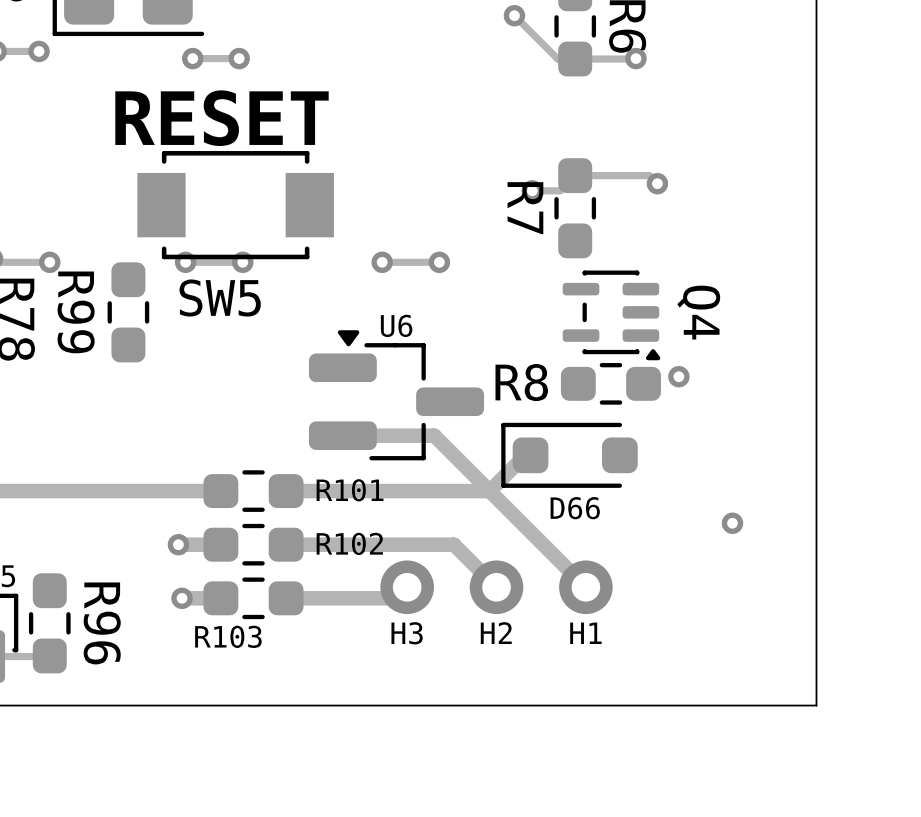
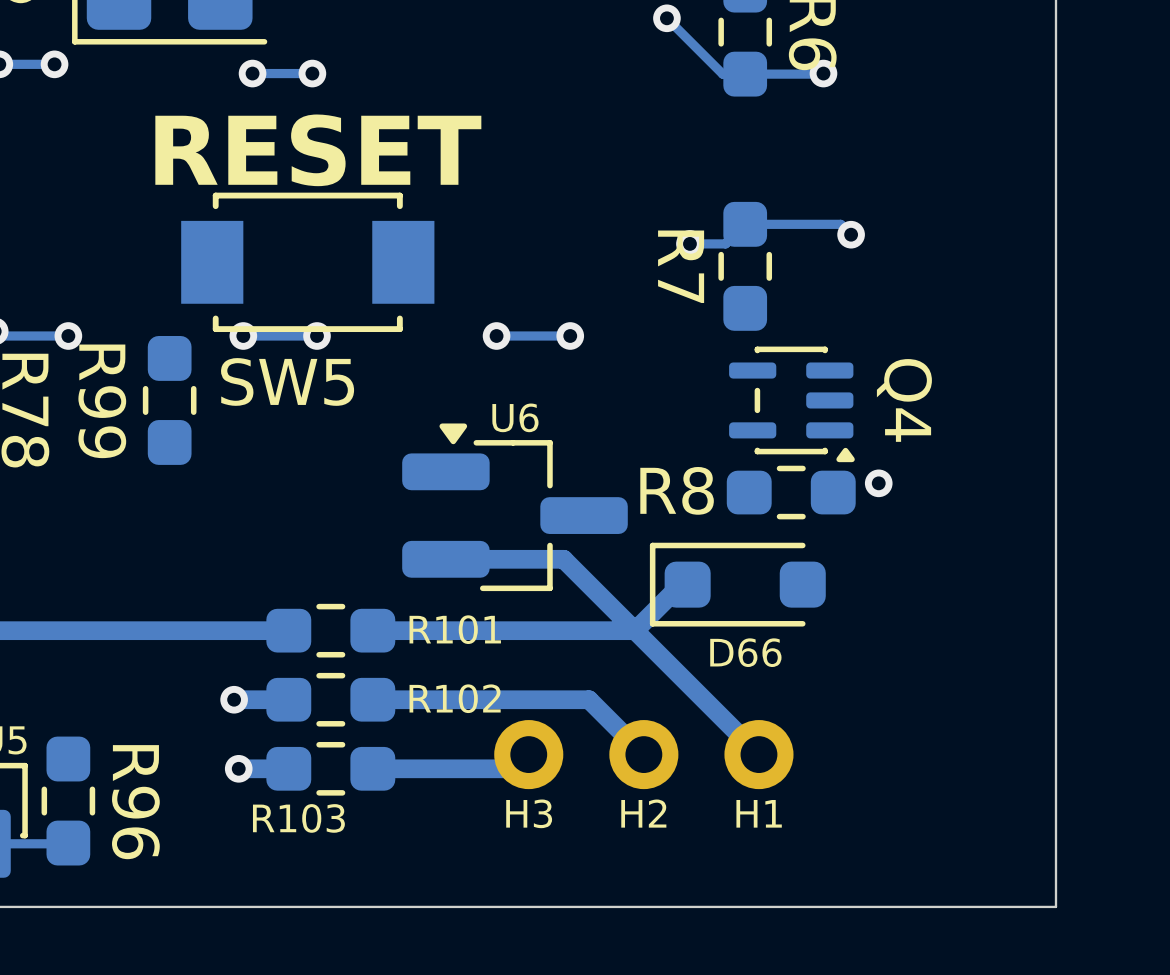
via: (732, 523) -> none

